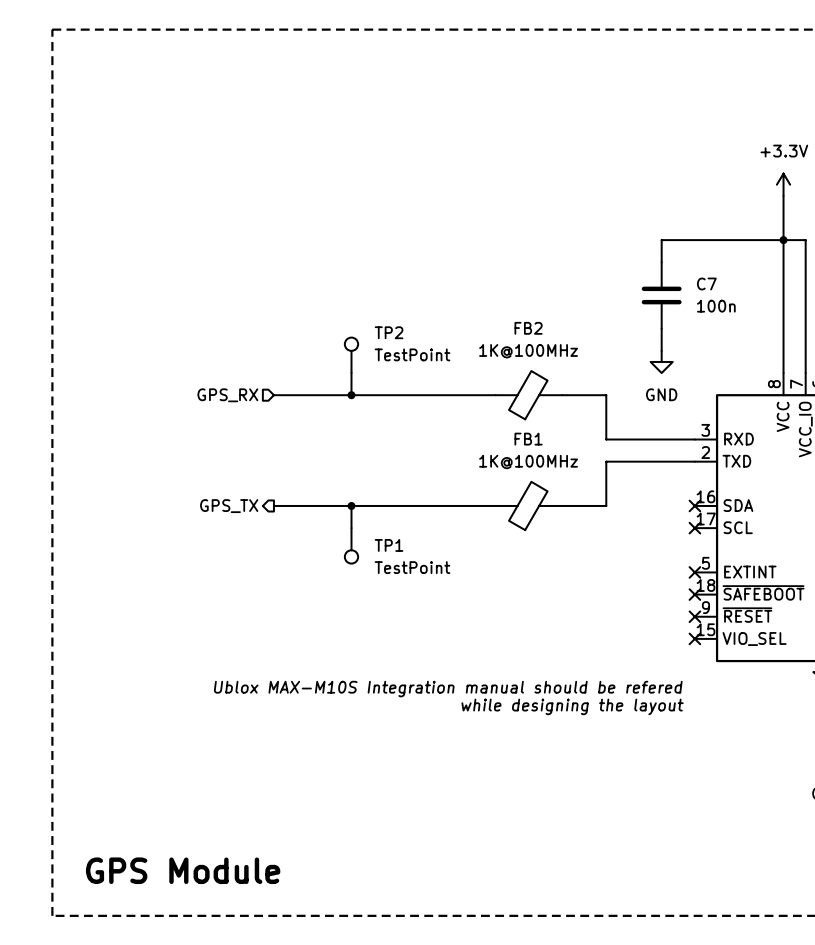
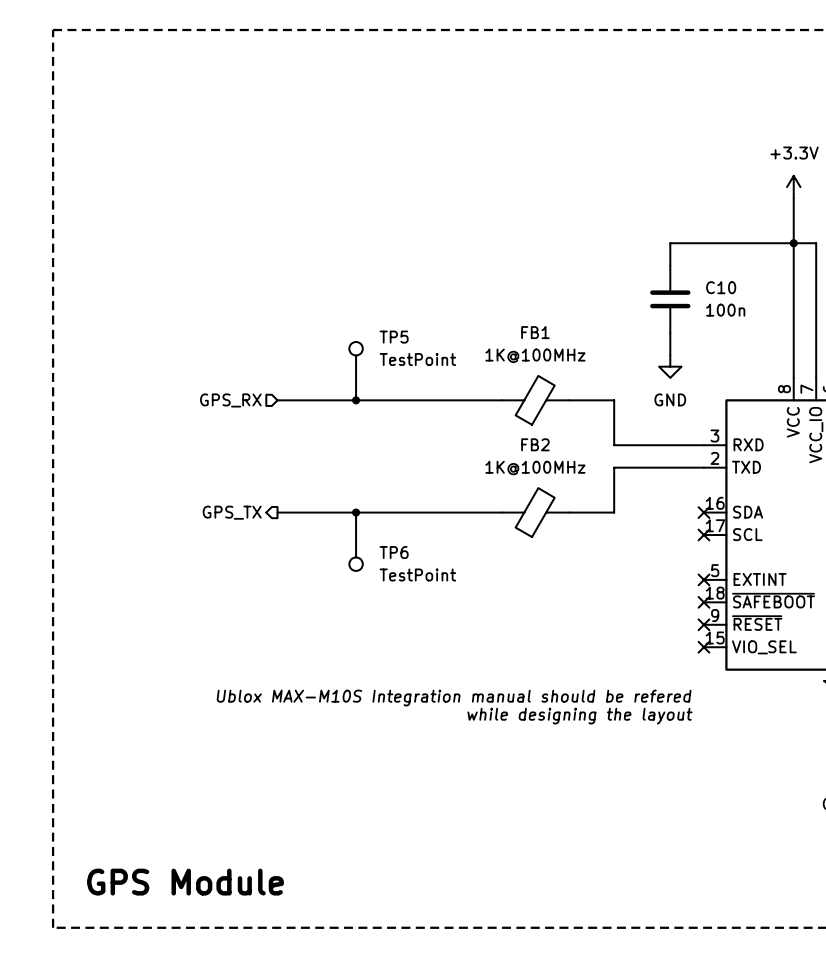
C7 name: C7 (706, 284) -> C10 (721, 287)
FB2 name: FB2 (528, 328) -> FB1 (535, 332)
TP2 name: TP2 (389, 332) -> TP5 (394, 337)
FB1 name: FB1 (528, 439) -> FB2 (535, 444)
TP1 name: TP1 (389, 545) -> TP6 (394, 552)

